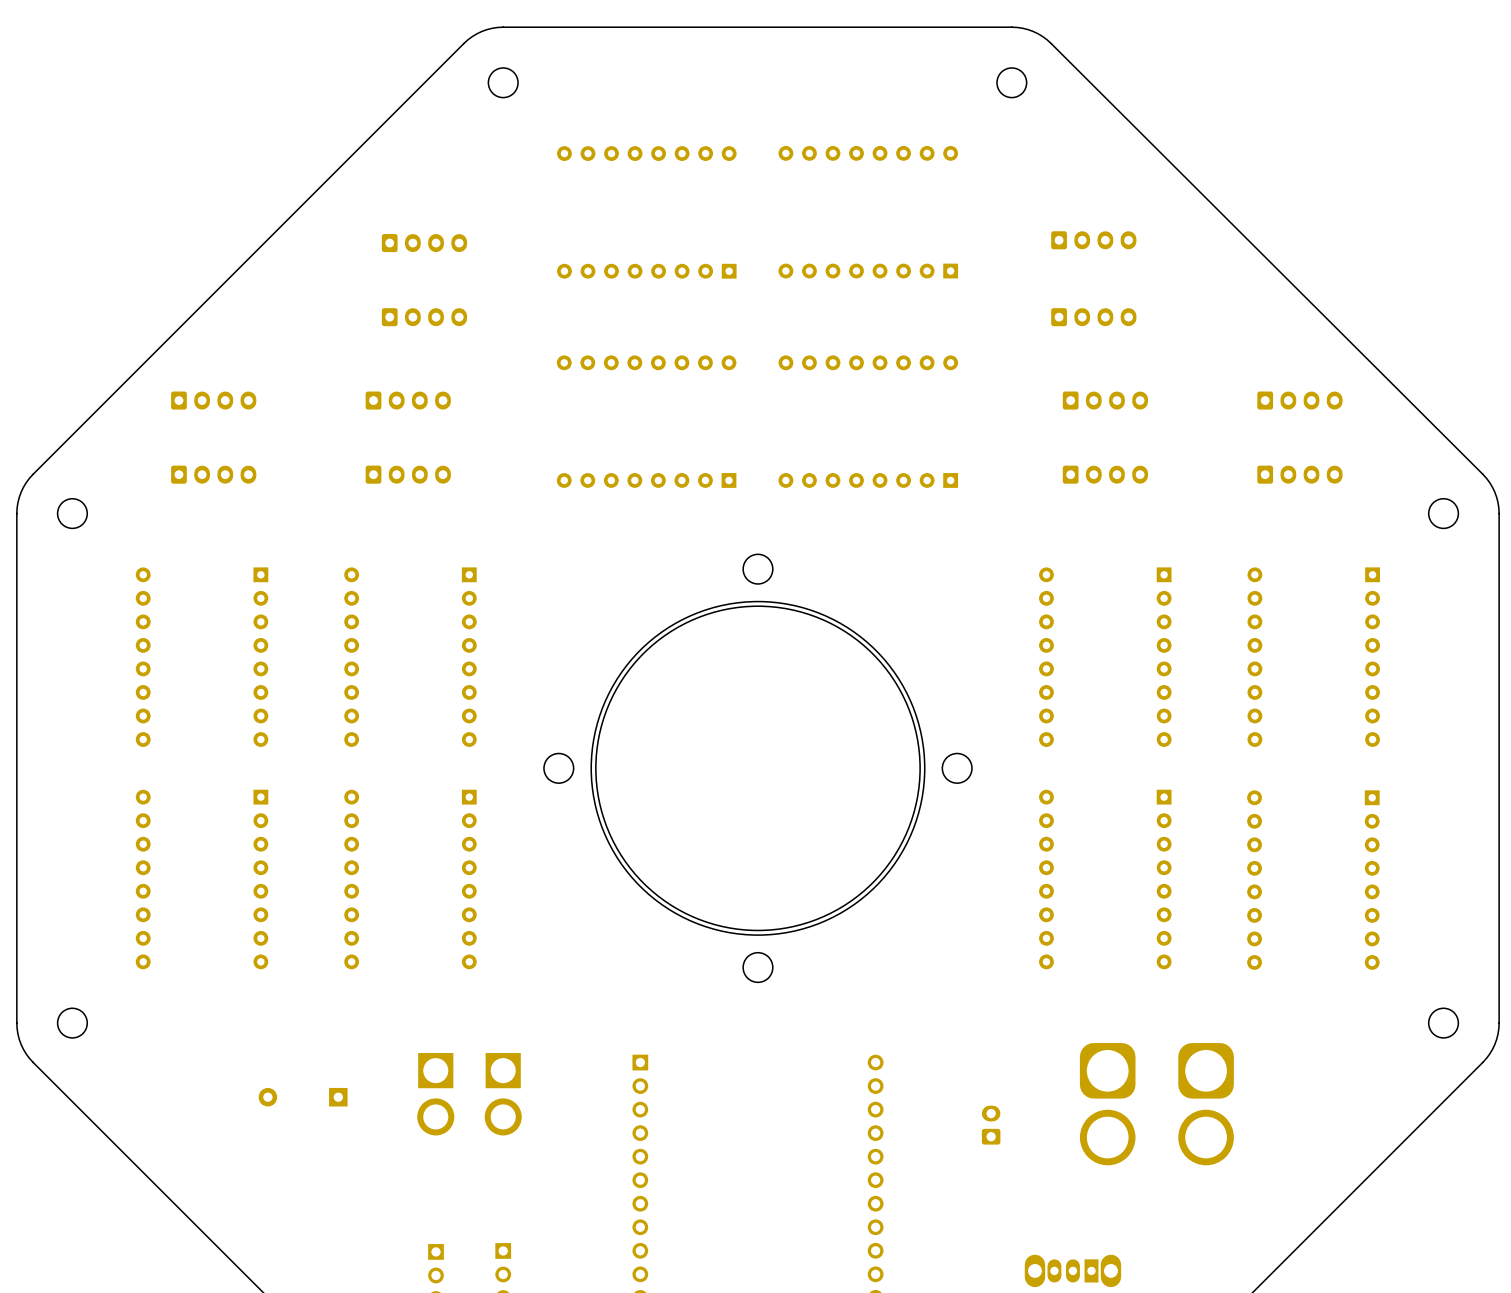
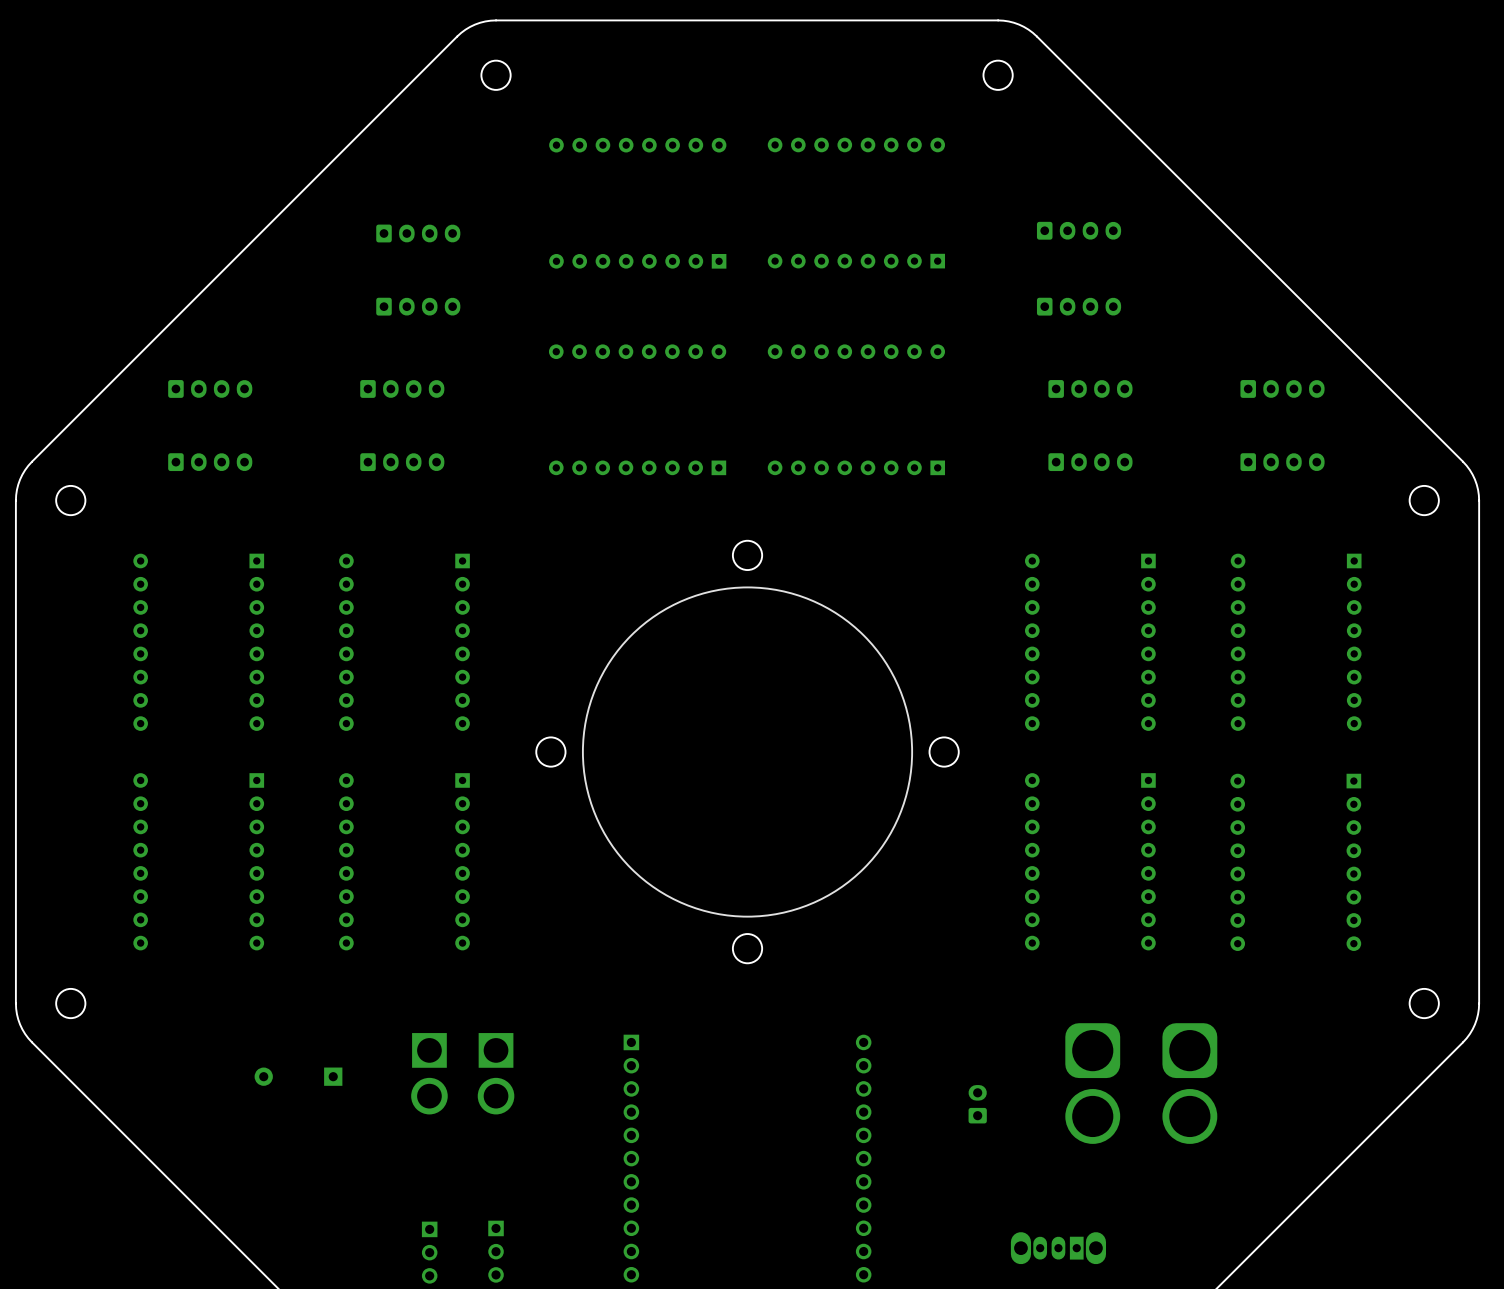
round board edge: [595, 605, 921, 931] -> none

